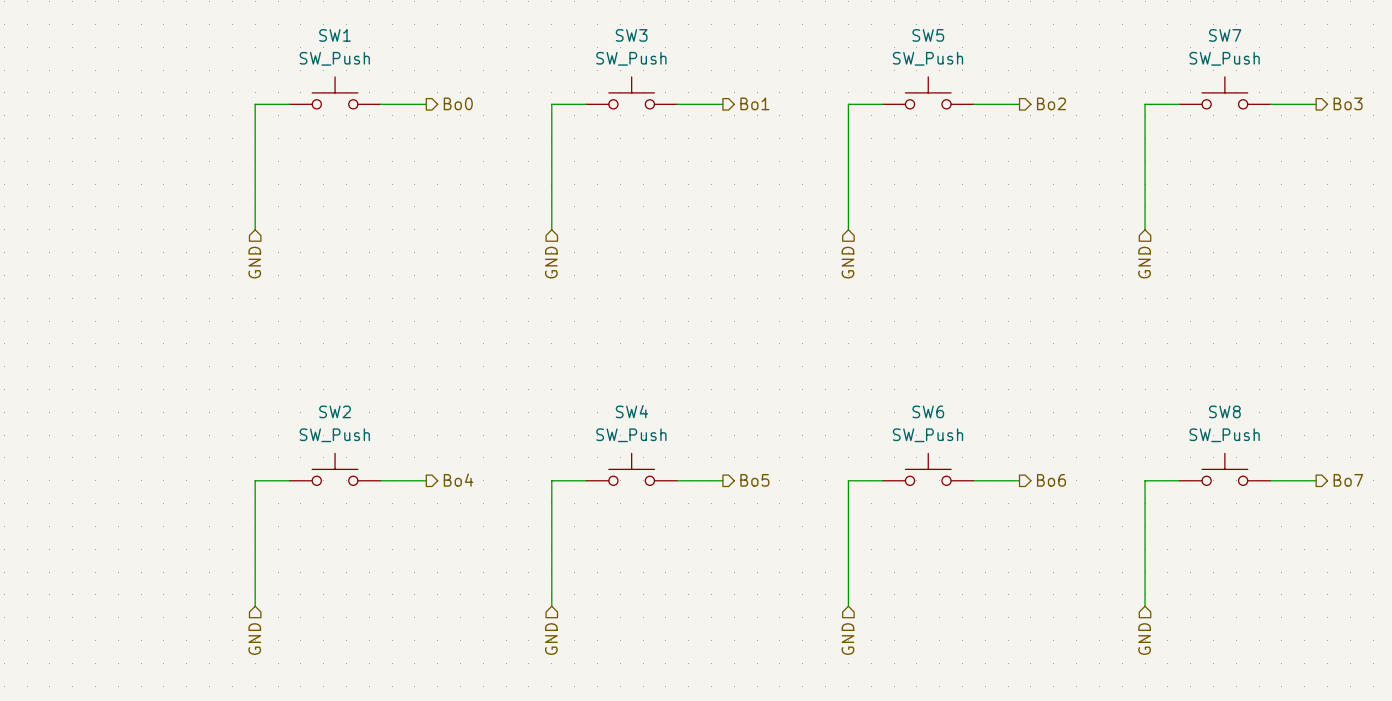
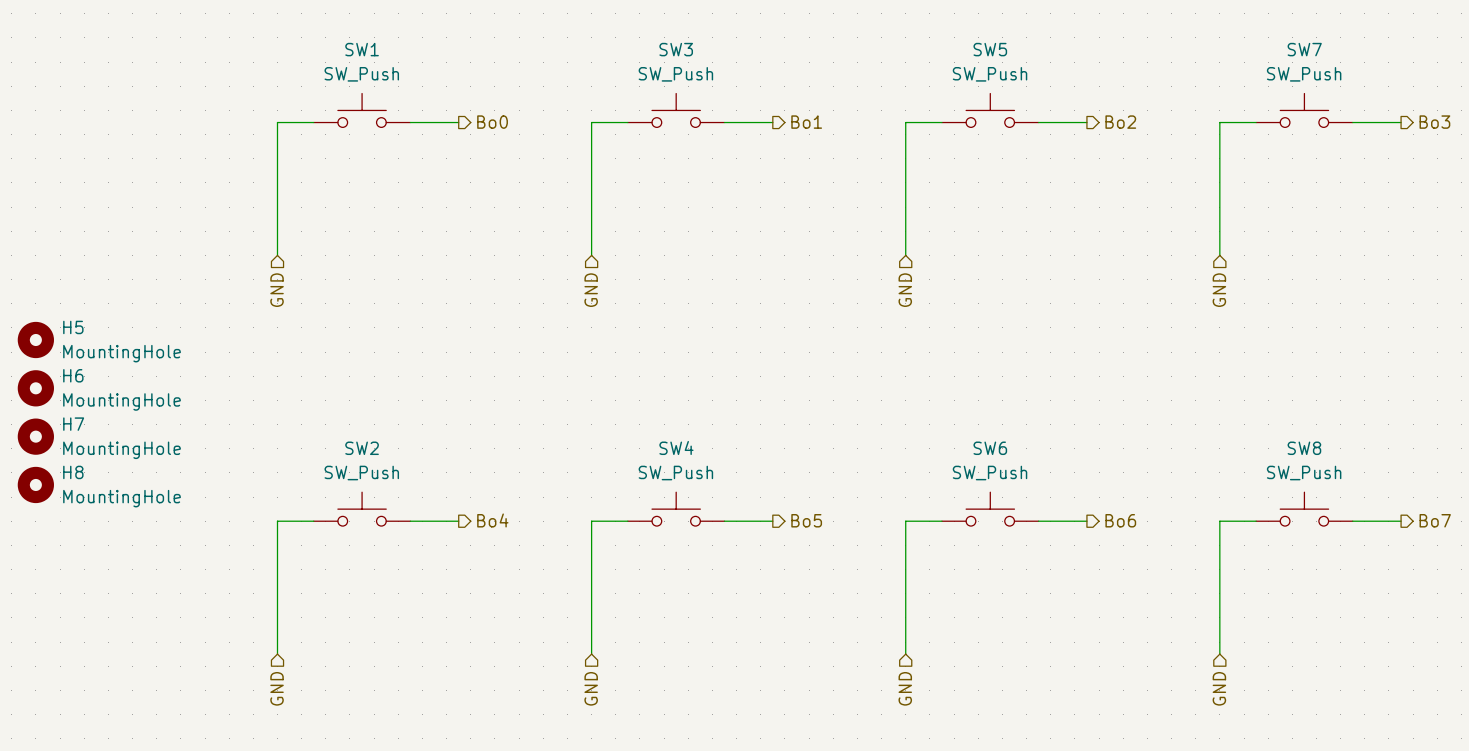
H5: none -> MountingHole (35, 339)
H6: none -> MountingHole (35, 388)
H7: none -> MountingHole (35, 436)
H8: none -> MountingHole (35, 484)

